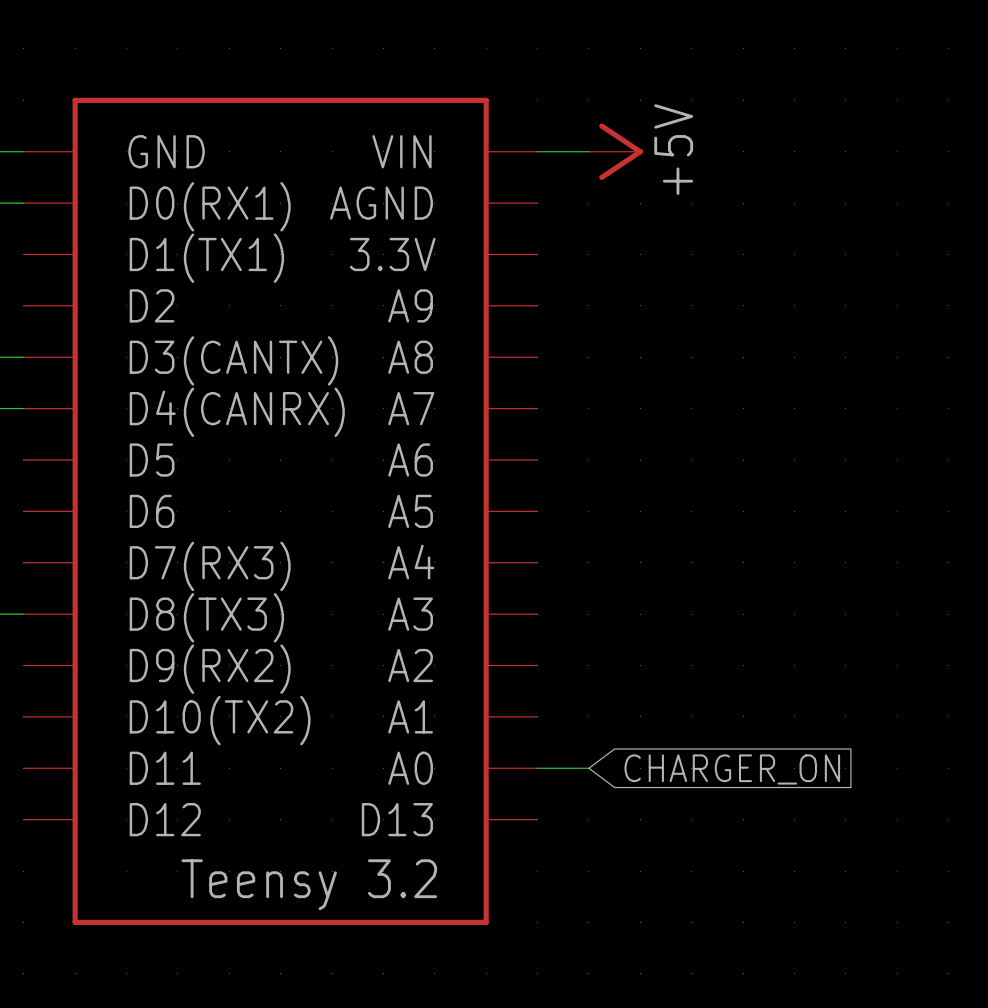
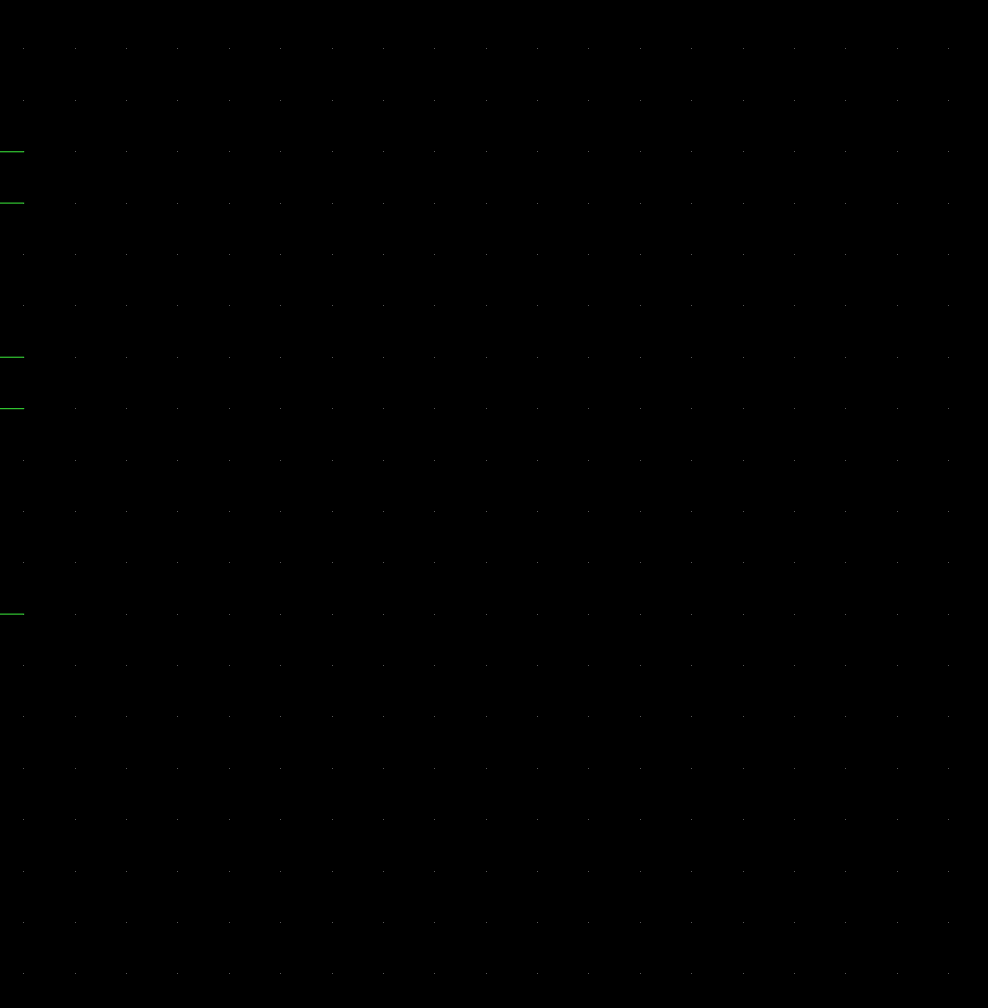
wire: (537, 151) (588, 151) -> none
power symbol: +5V (615, 151) -> none
part: (280, 511) -> none
wire: (537, 768) (588, 768) -> none
global label: CHARGER_ON (732, 769) -> none

